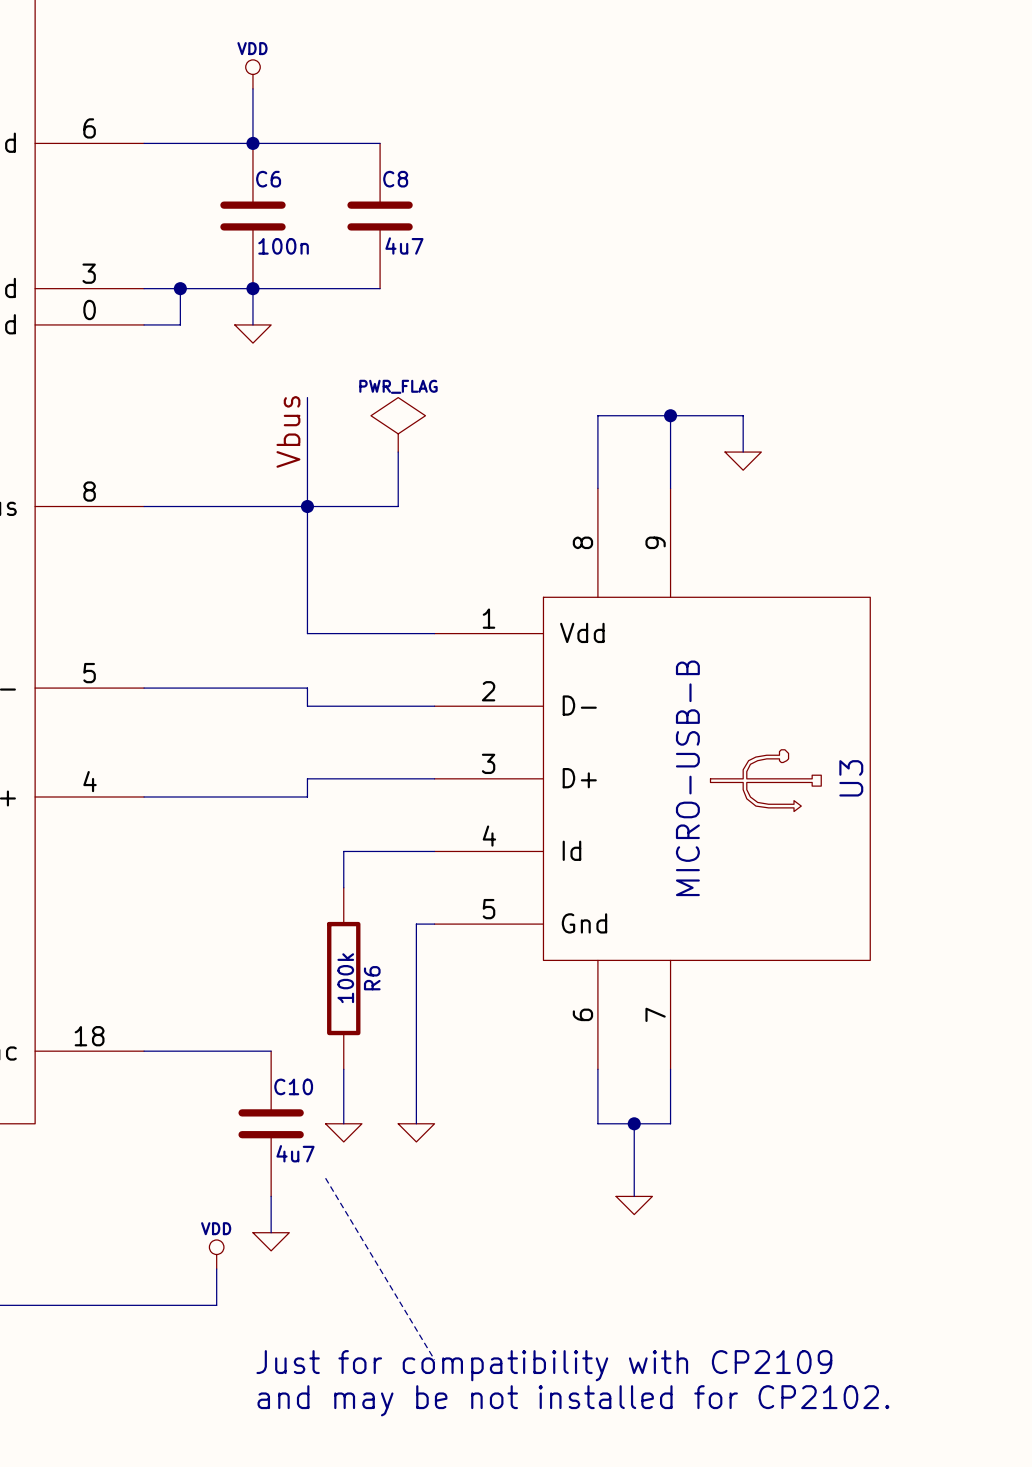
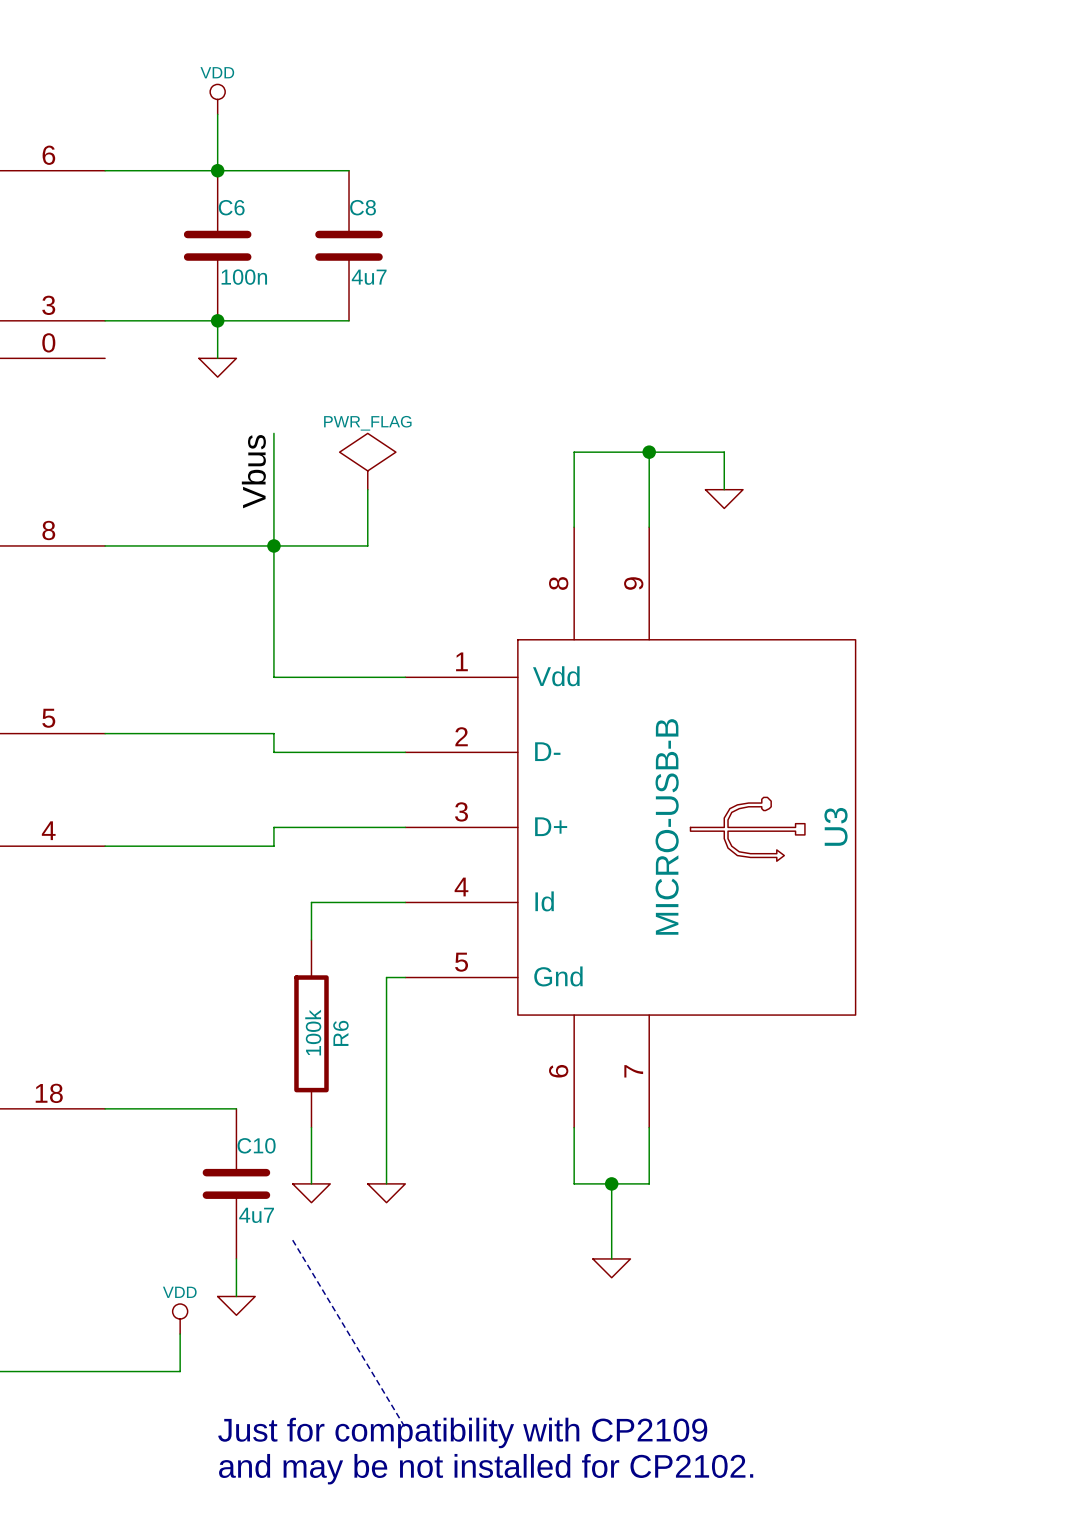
wire: (180, 288) (180, 324) (144, 324) -> none
junction: (180, 288) -> none

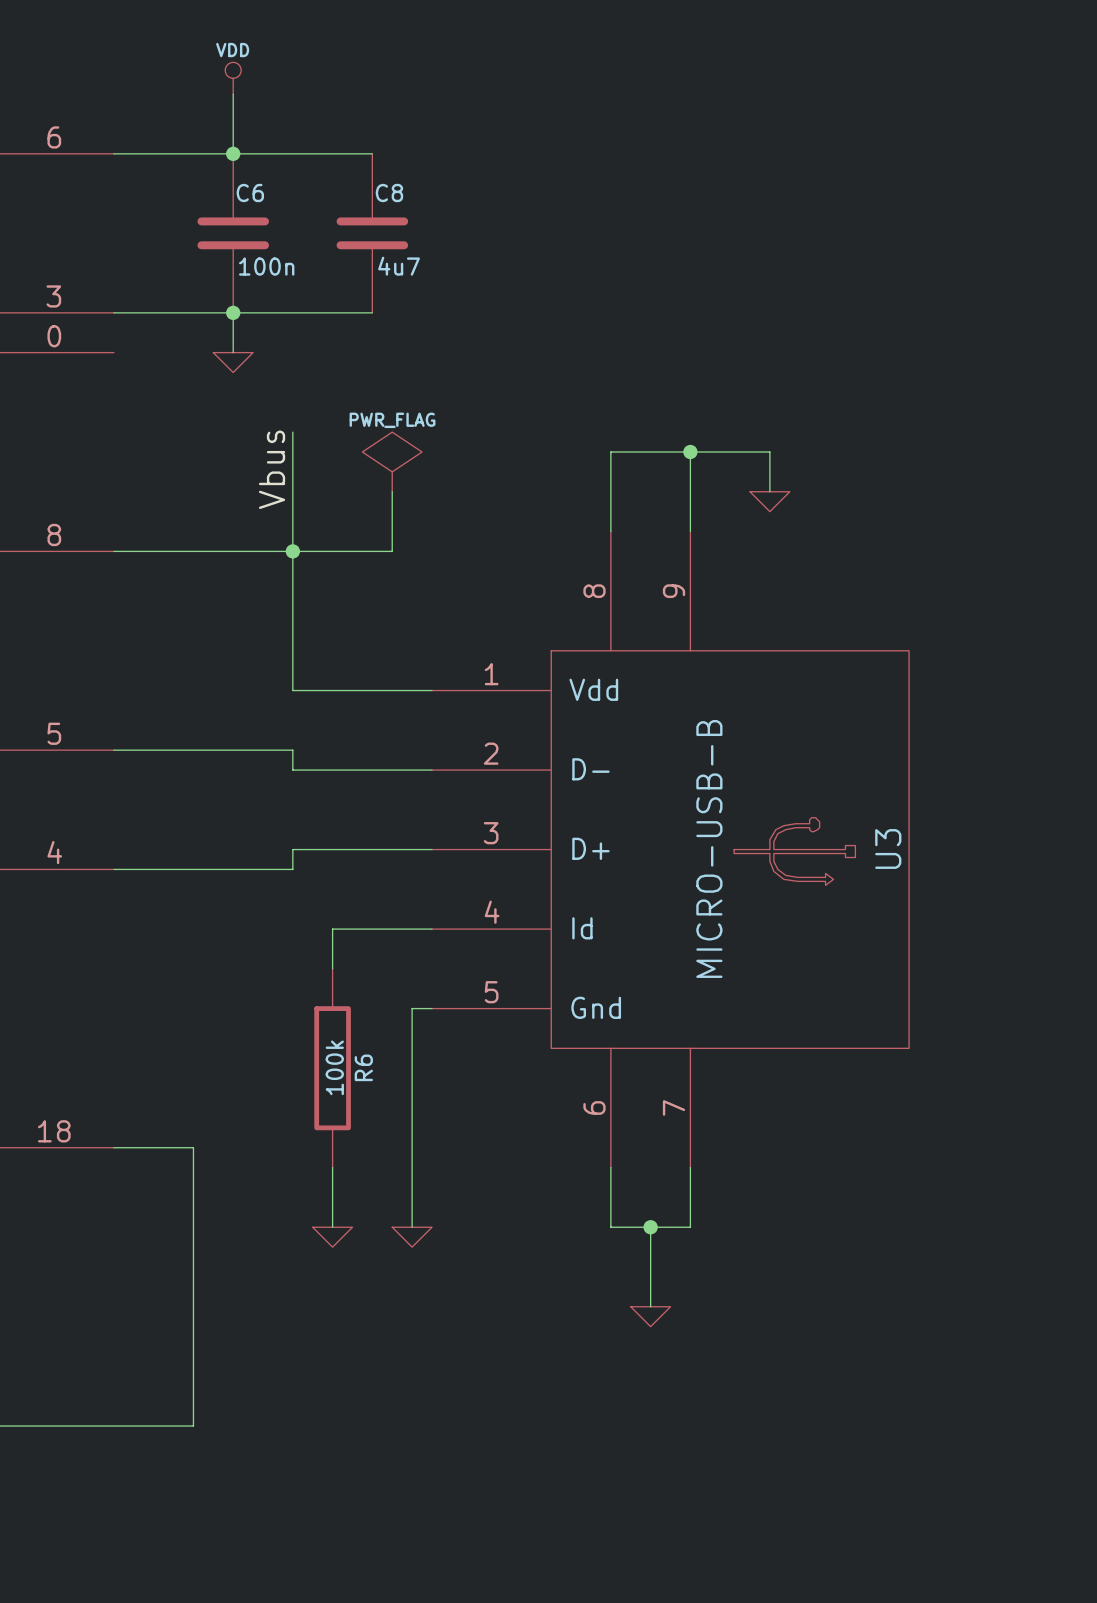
wire: (180, 1108) (236, 1108) -> (193, 1147) (193, 1386)
C10: 4u7 (236, 1183) -> none
line: (292, 1240) (405, 1427) -> none
wire: (236, 1258) (236, 1296) -> none
power symbol: (236, 1305) -> none
power symbol: VDD (180, 1319) -> none
text: Just for compatibility with CP2109 (462, 1432) -> none
text: and may be not installed for CP2102. (486, 1469) -> none

